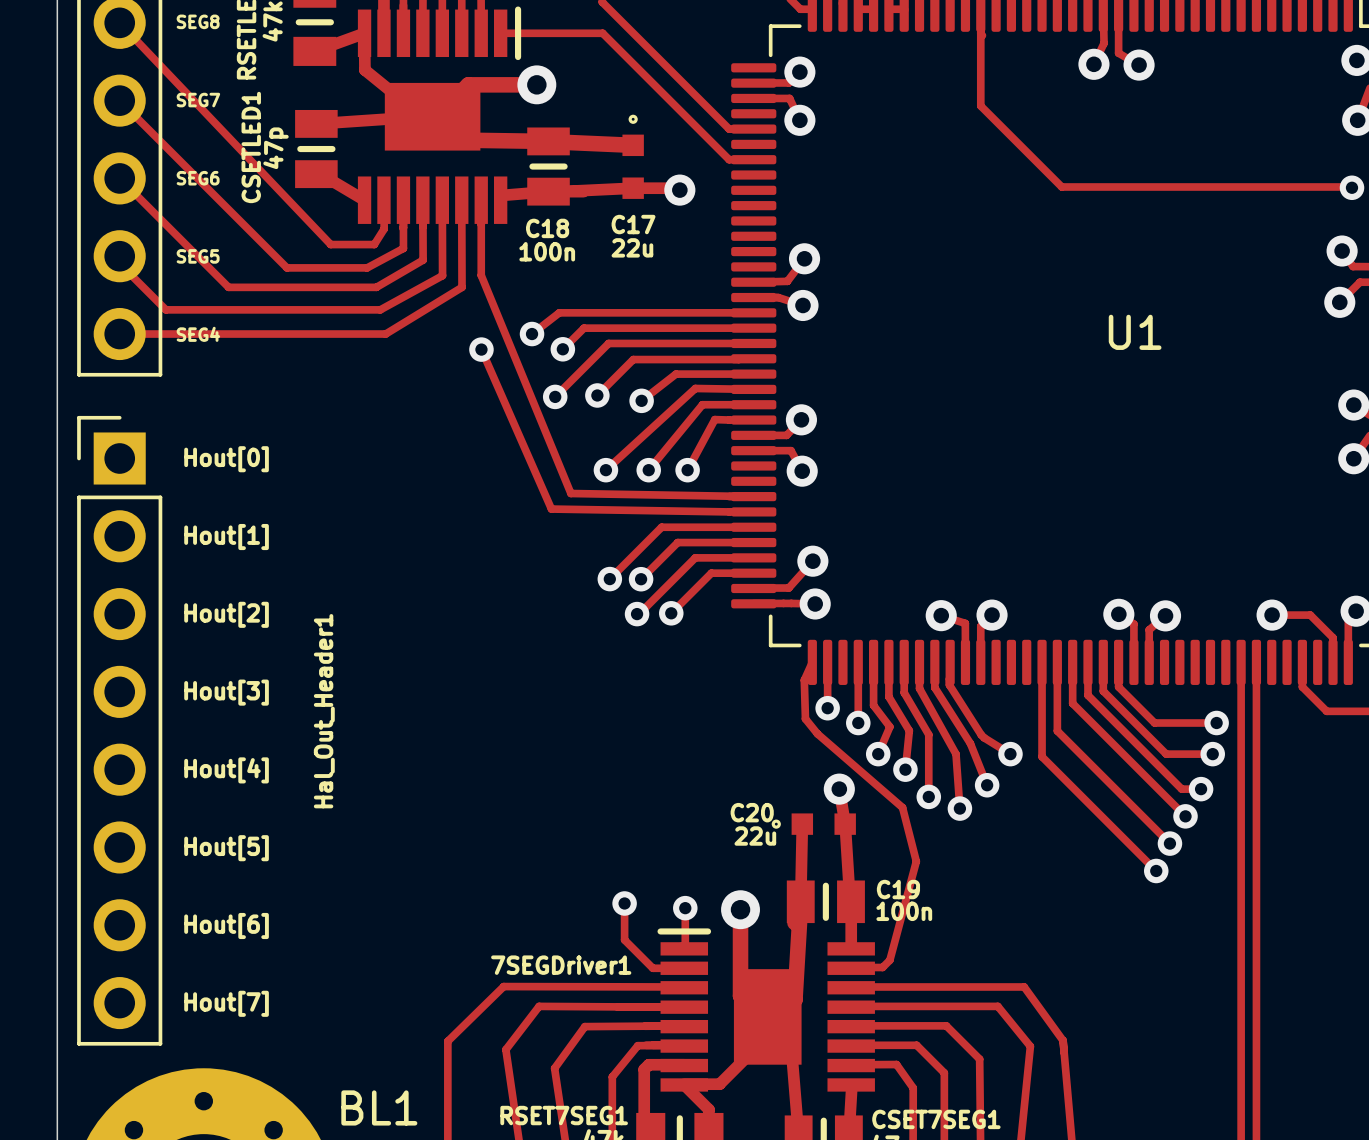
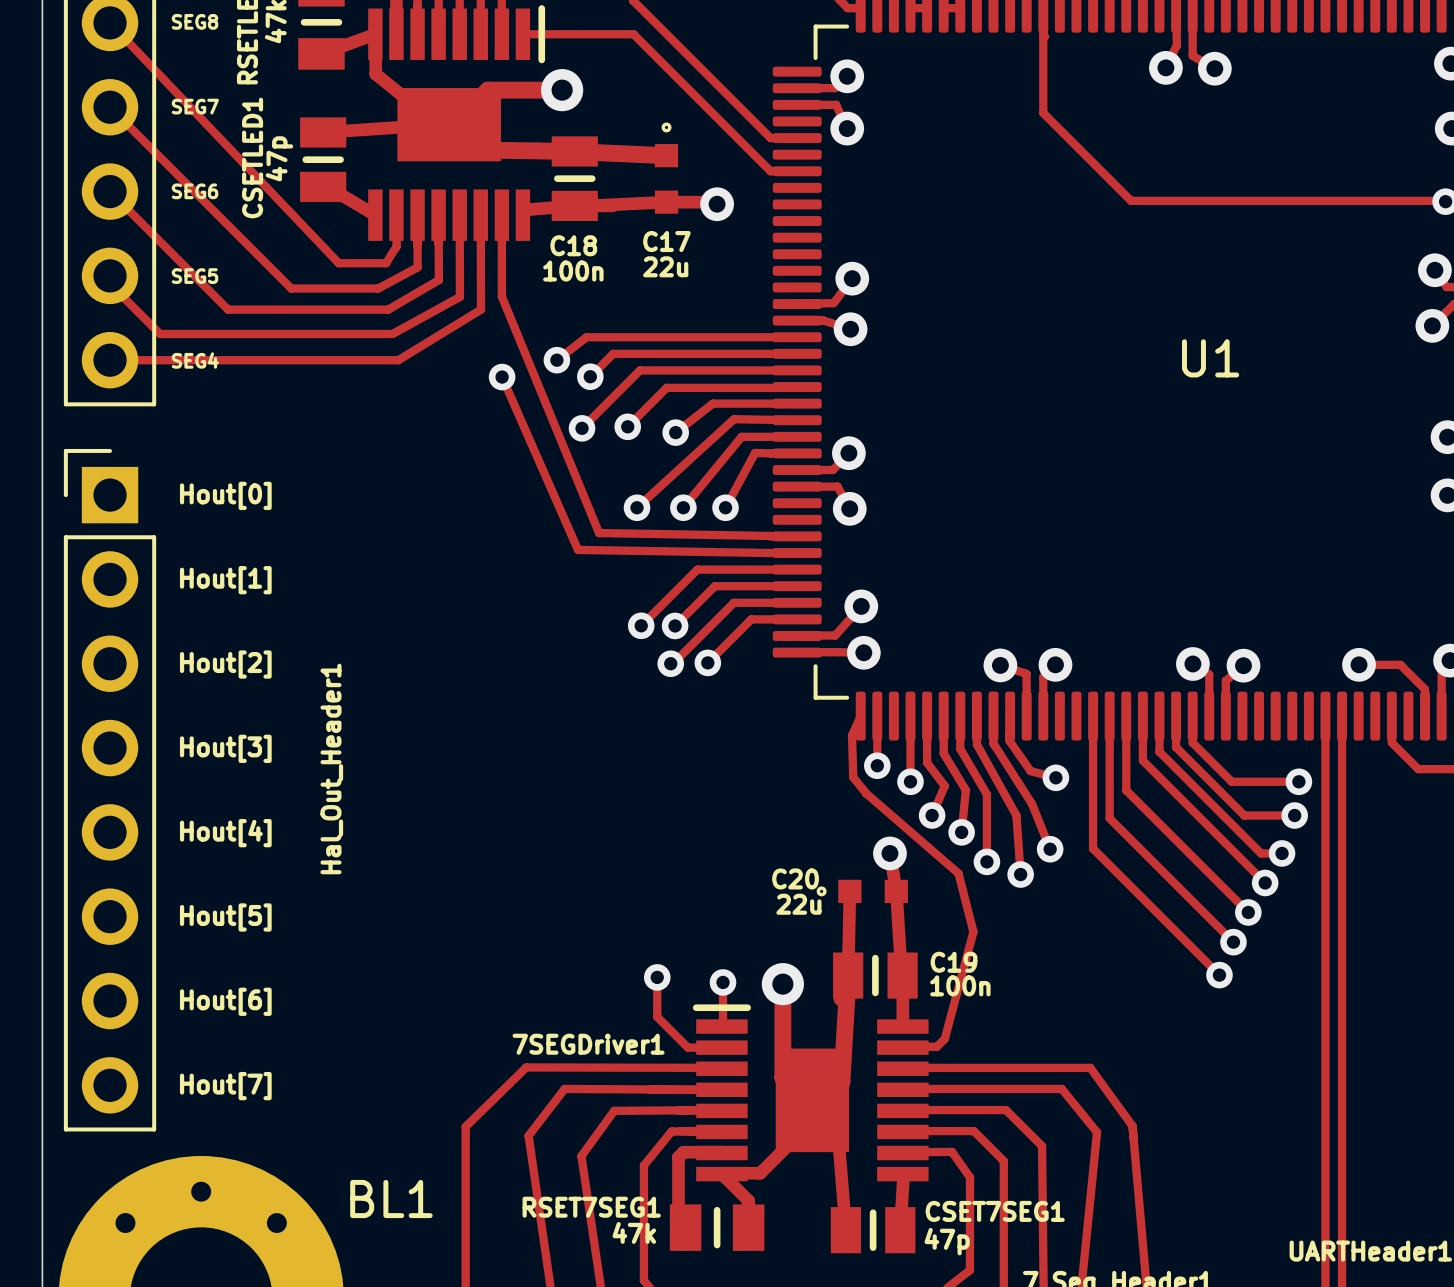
track: none -> (1093, 716) (1093, 848) (1219, 975)
track: (949, 684) (981, 734) (1010, 754) -> (1009, 740) (1030, 771) (1055, 777)
via position: (1010, 754) -> (1055, 777)
via: none -> (1219, 975)

